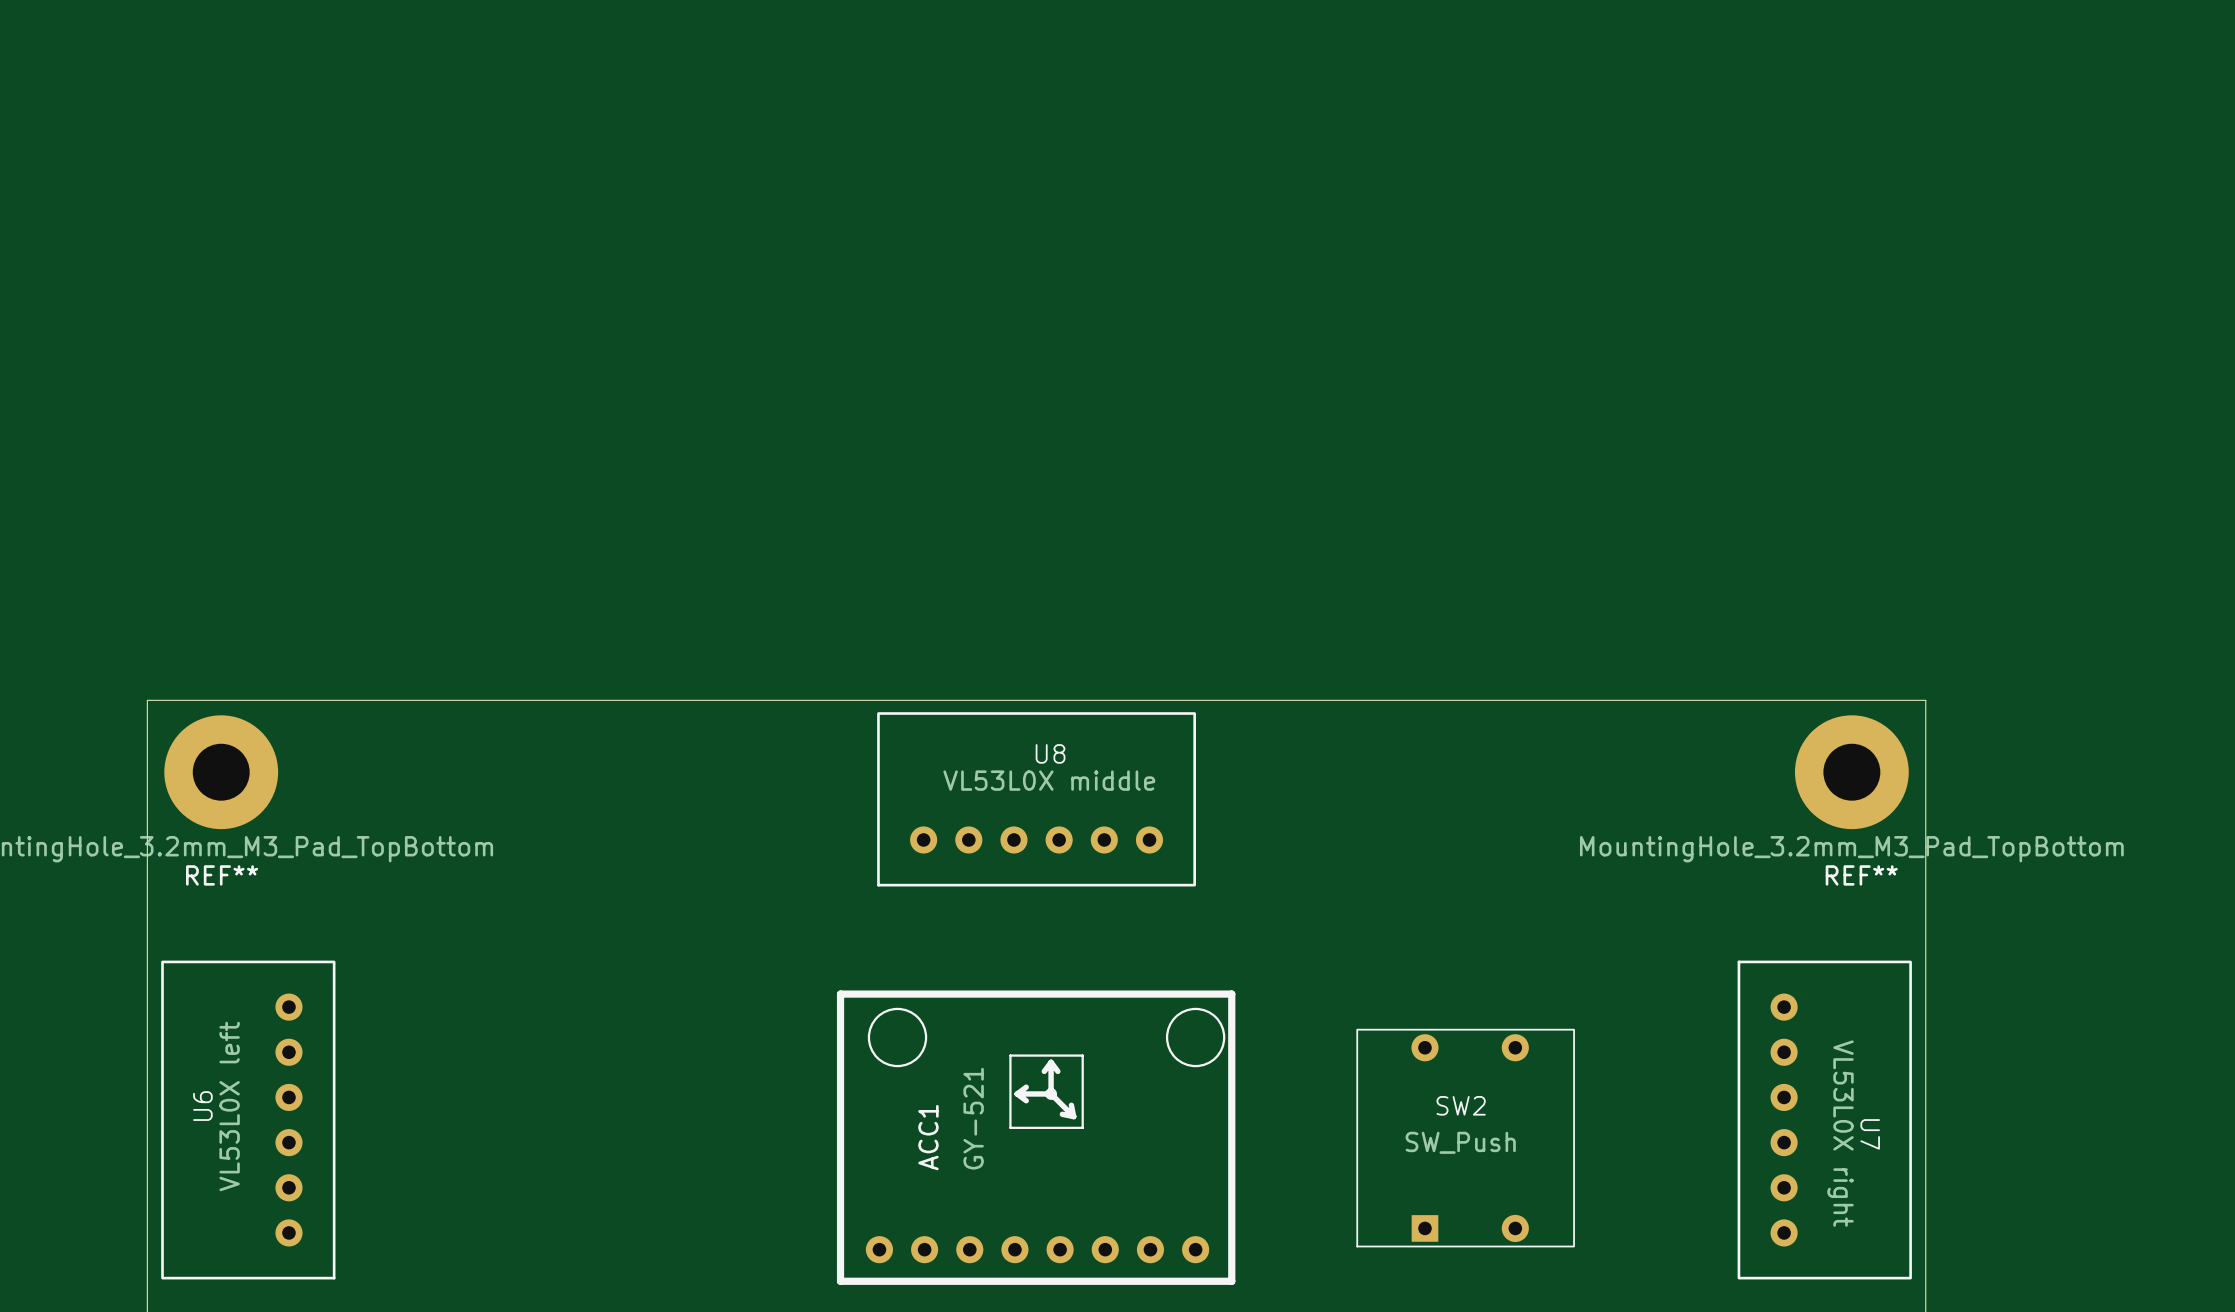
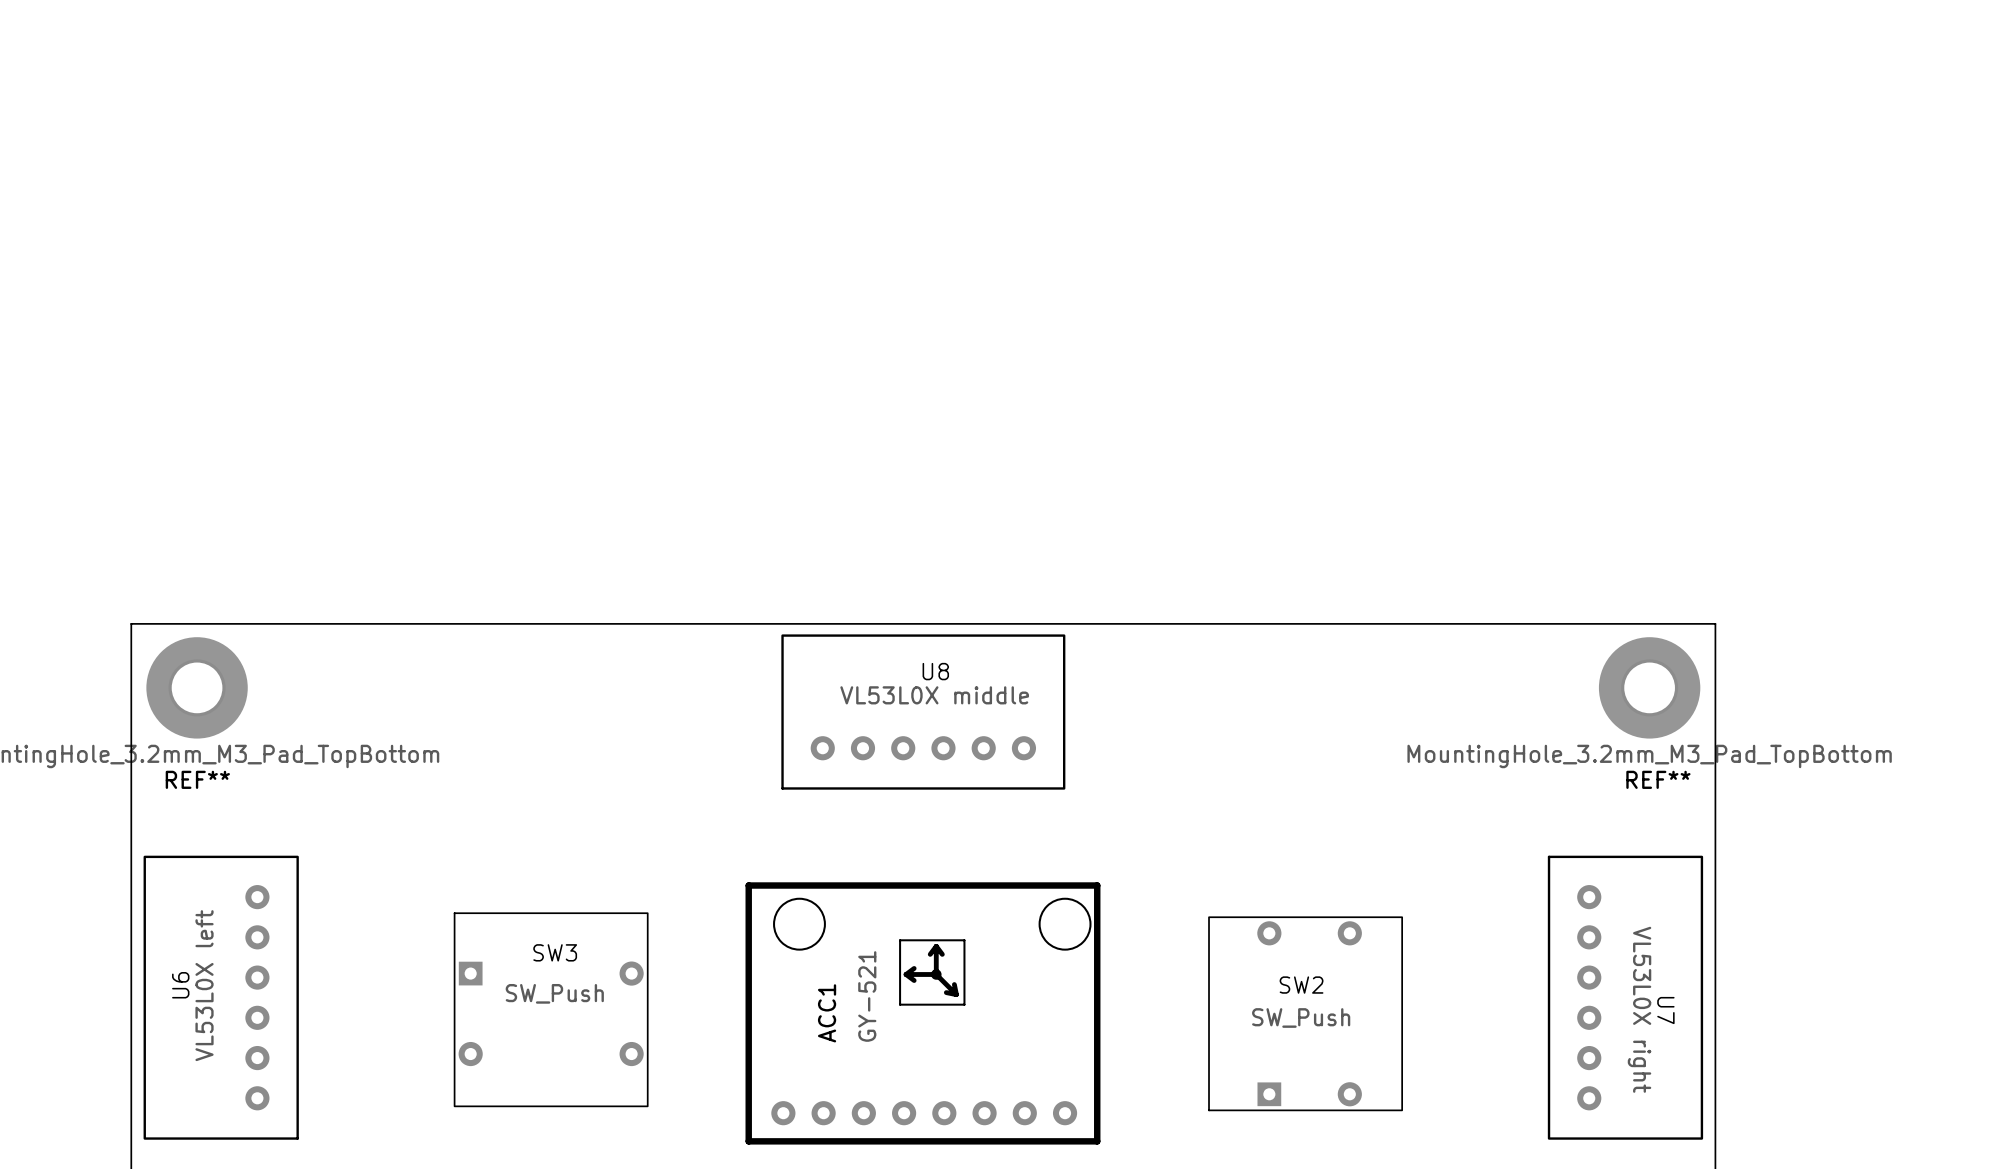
SW3: none -> SW_Push (551, 1009)

